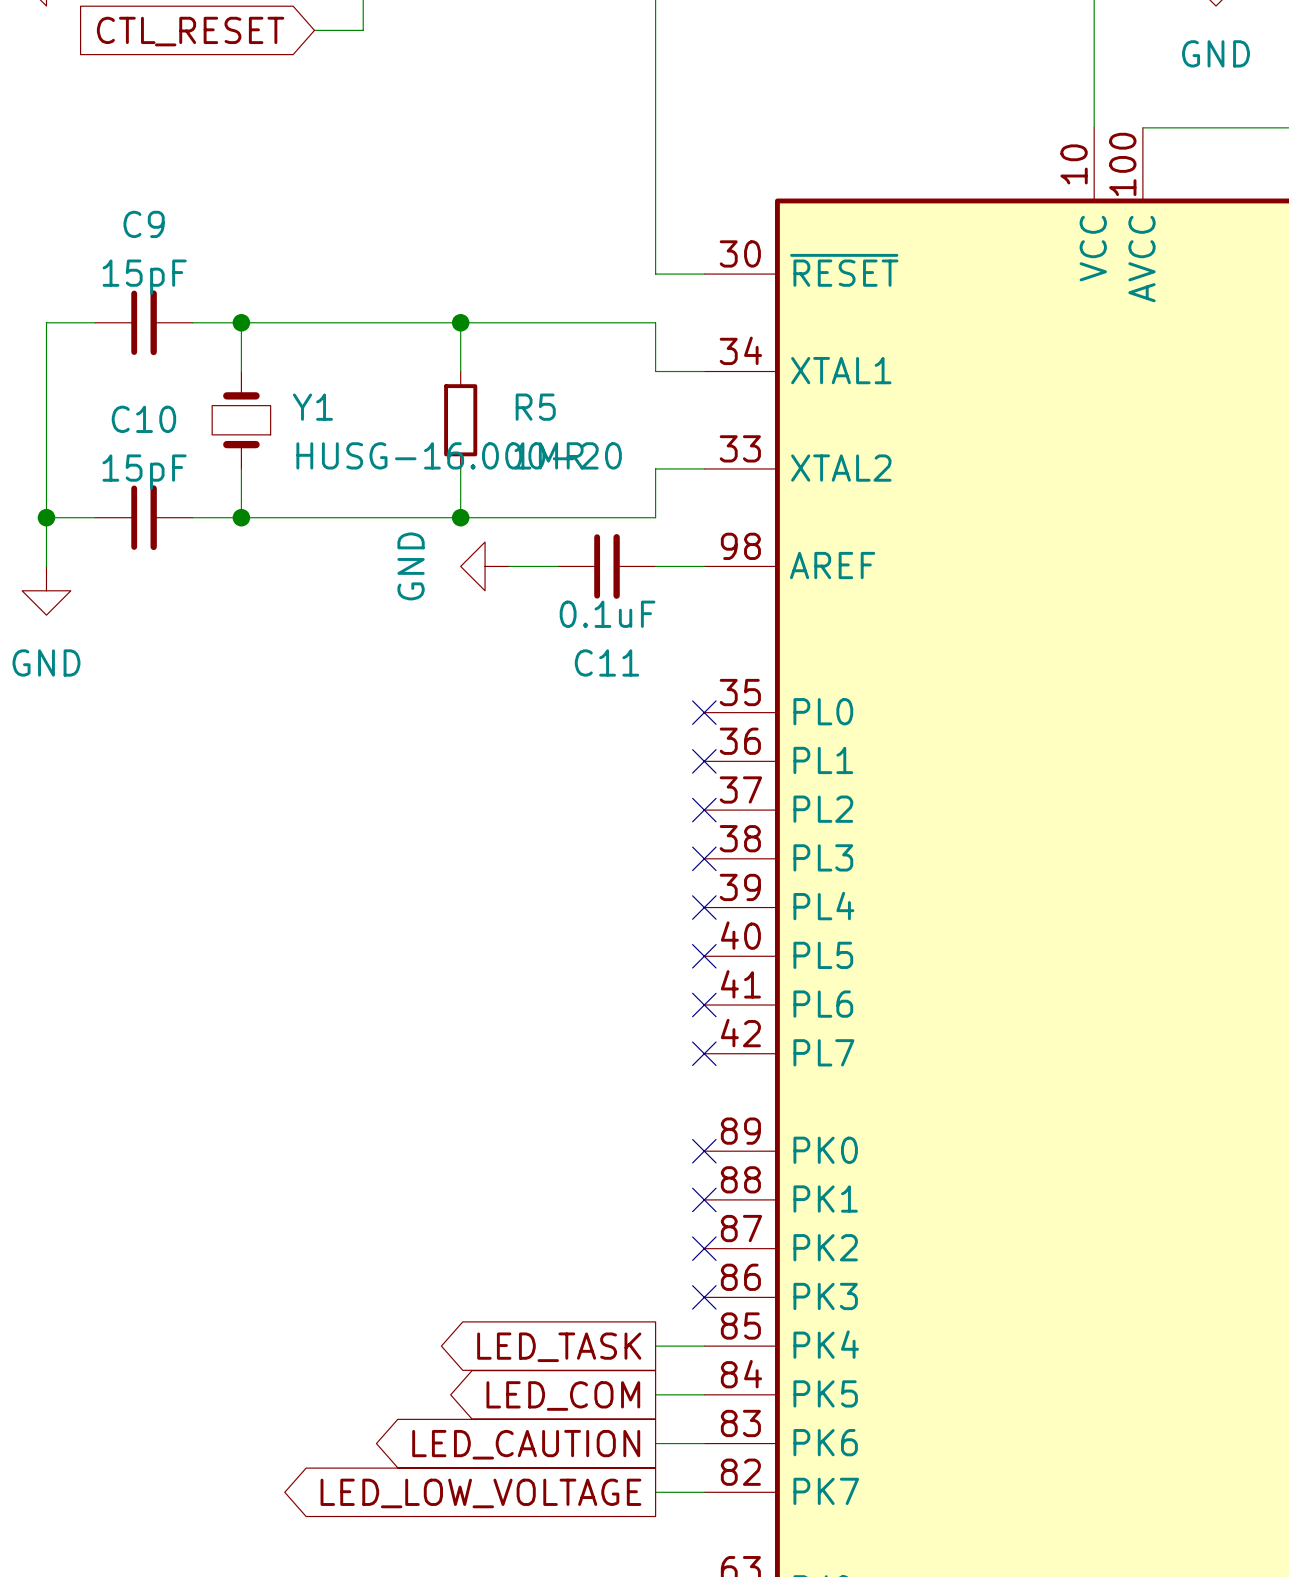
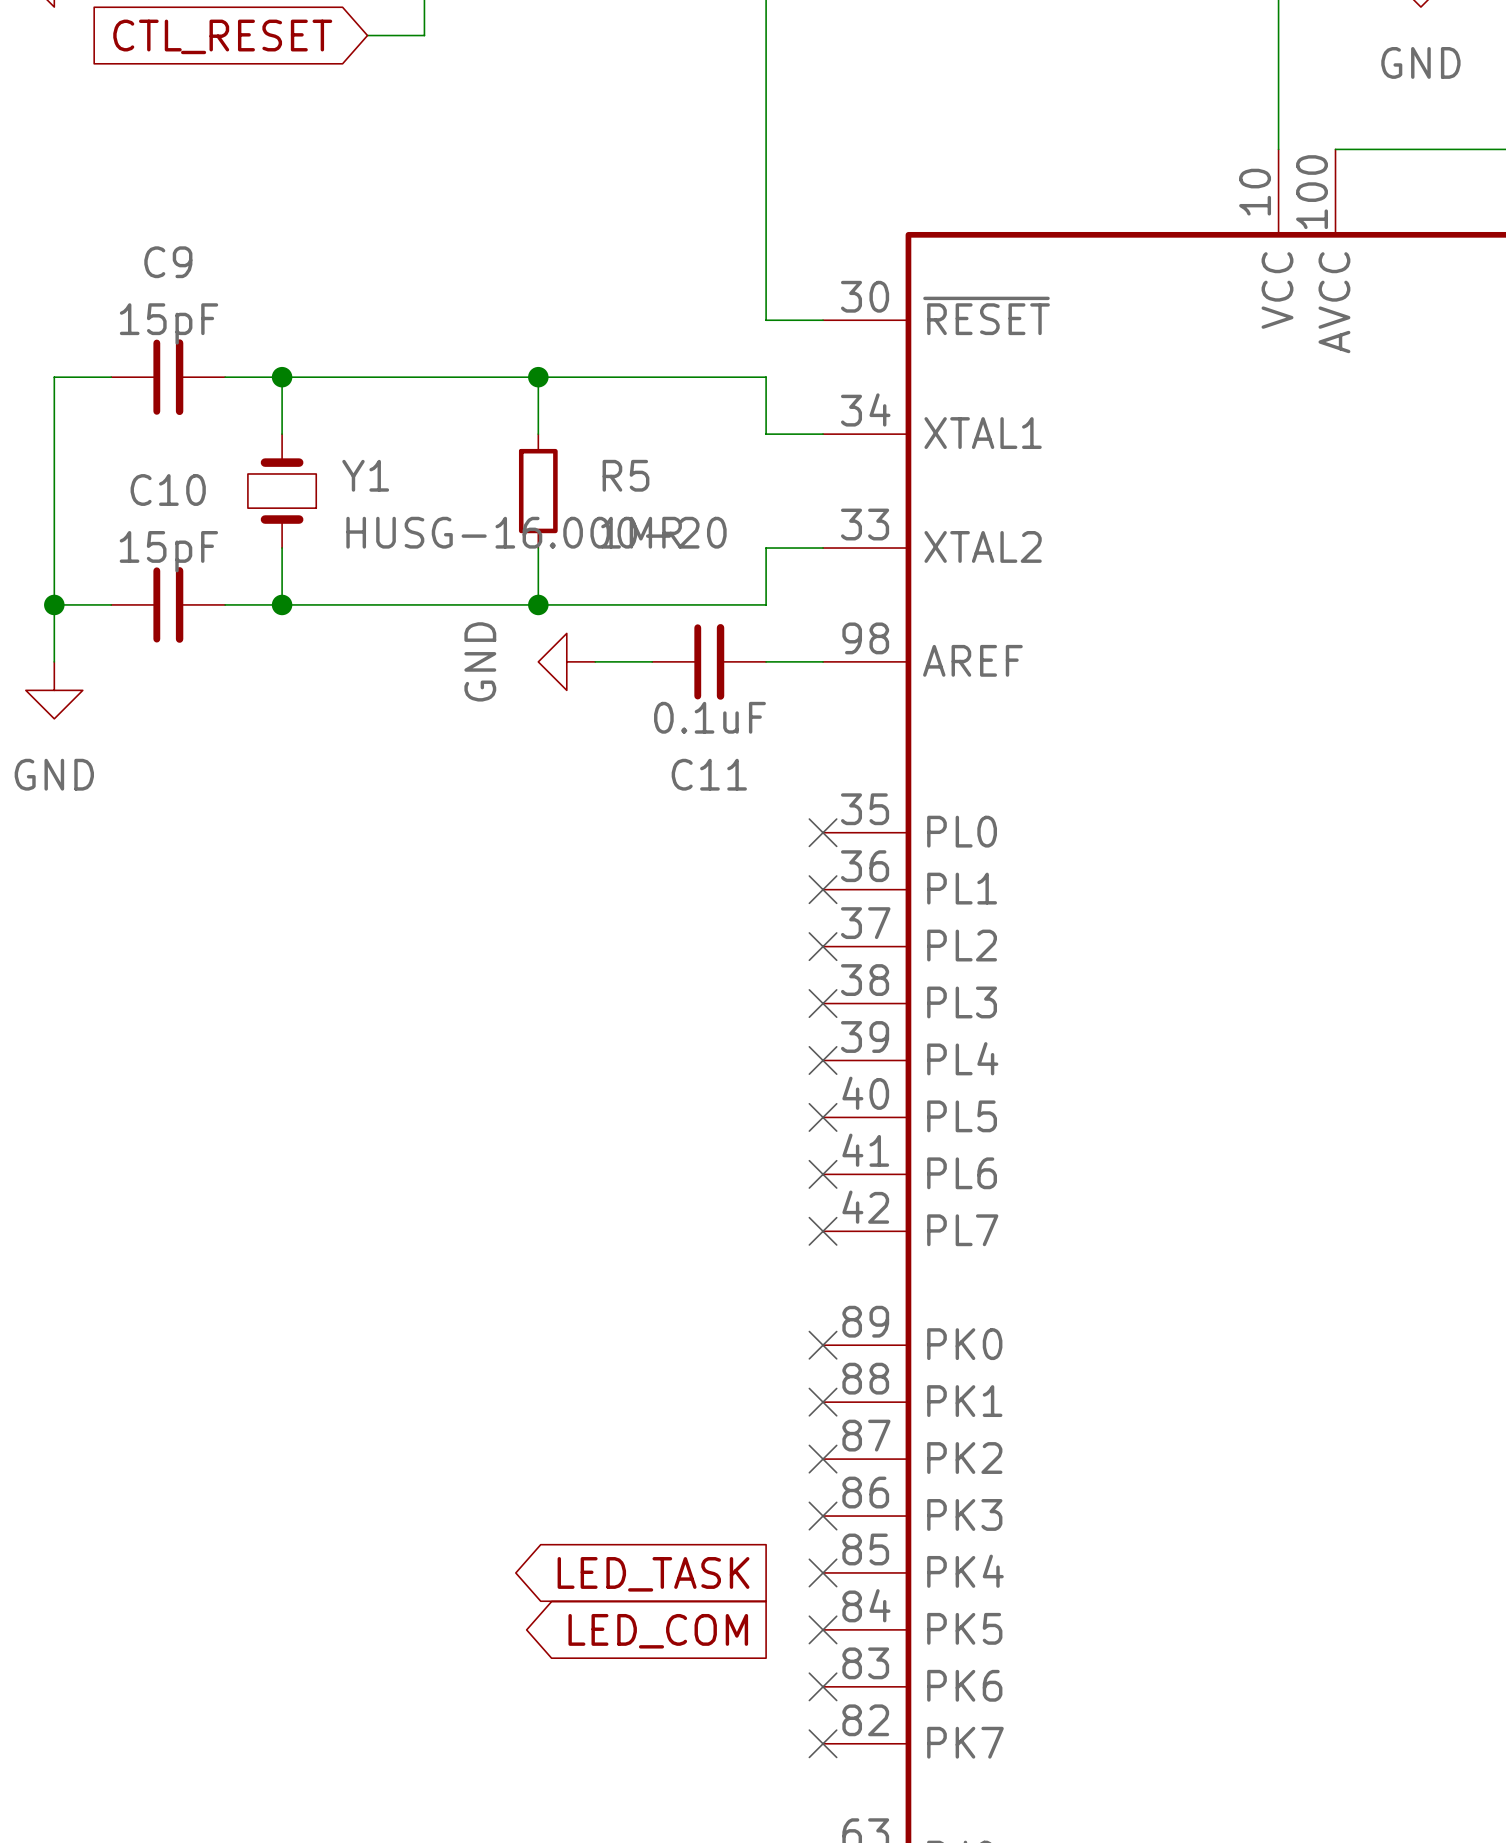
wire: (655, 1346) (704, 1346) -> none
no-connect mark: none -> (823, 1572)
wire: (655, 1394) (704, 1394) -> none
no-connect mark: none -> (823, 1629)
wire: (655, 1443) (704, 1443) -> none
no-connect mark: none -> (823, 1686)
global label: LED_CAUTION (526, 1444) -> none
wire: (655, 1492) (704, 1492) -> none
no-connect mark: none -> (823, 1743)
global label: LED_LOW_VOLTAGE (480, 1493) -> none

